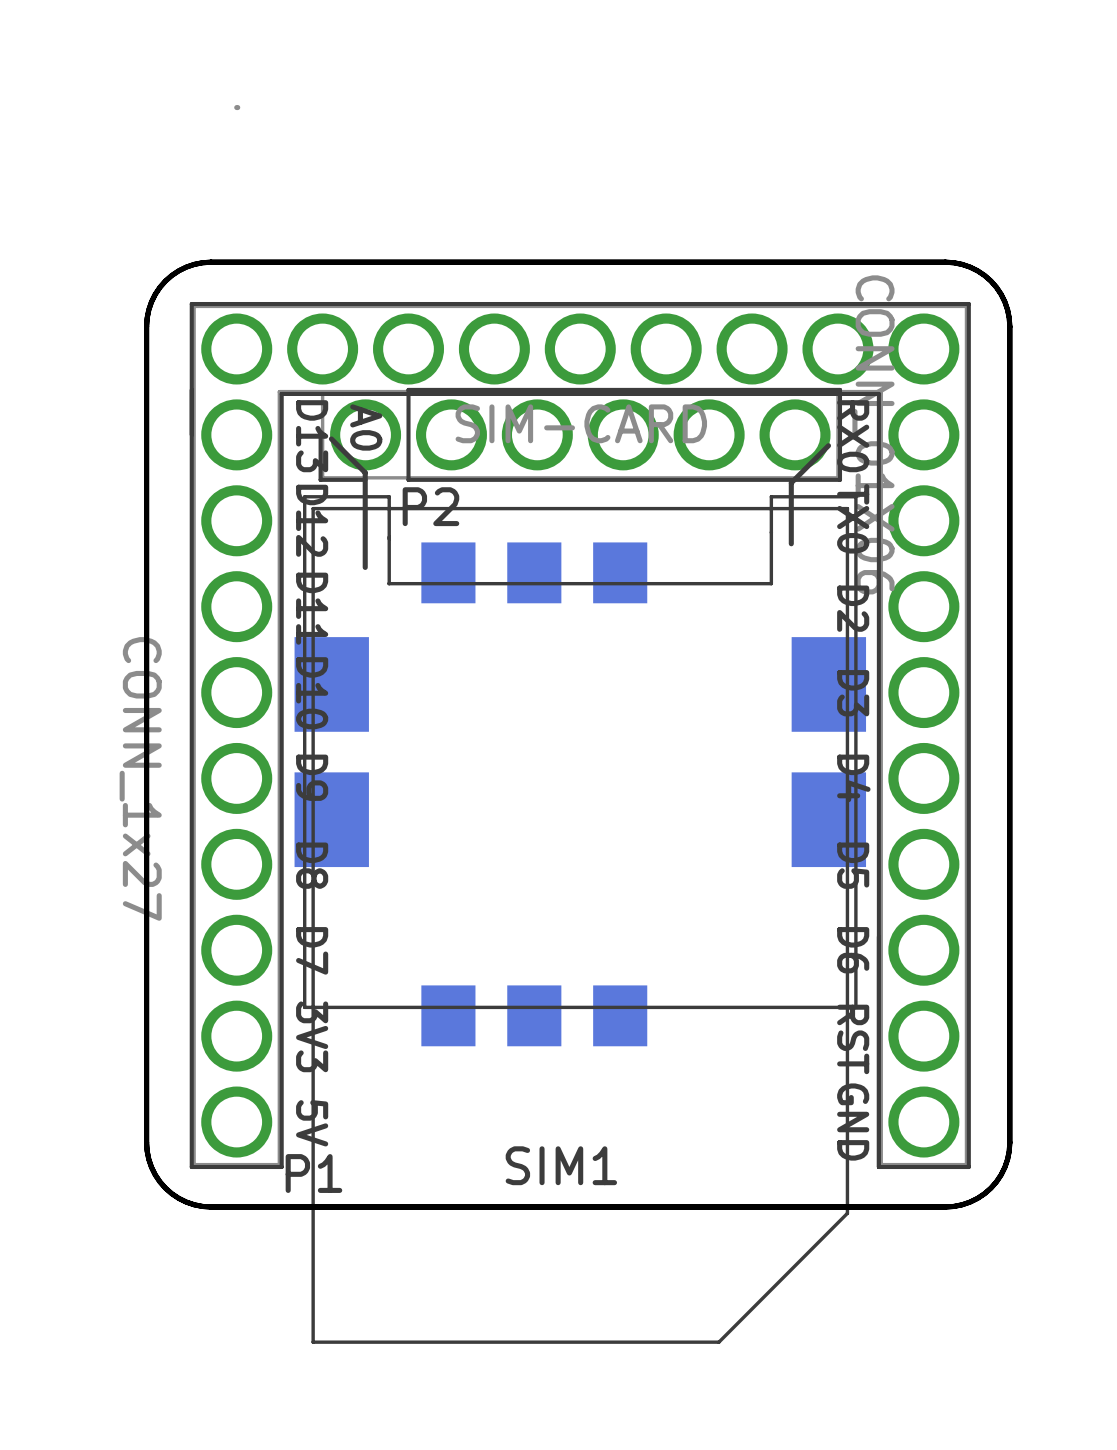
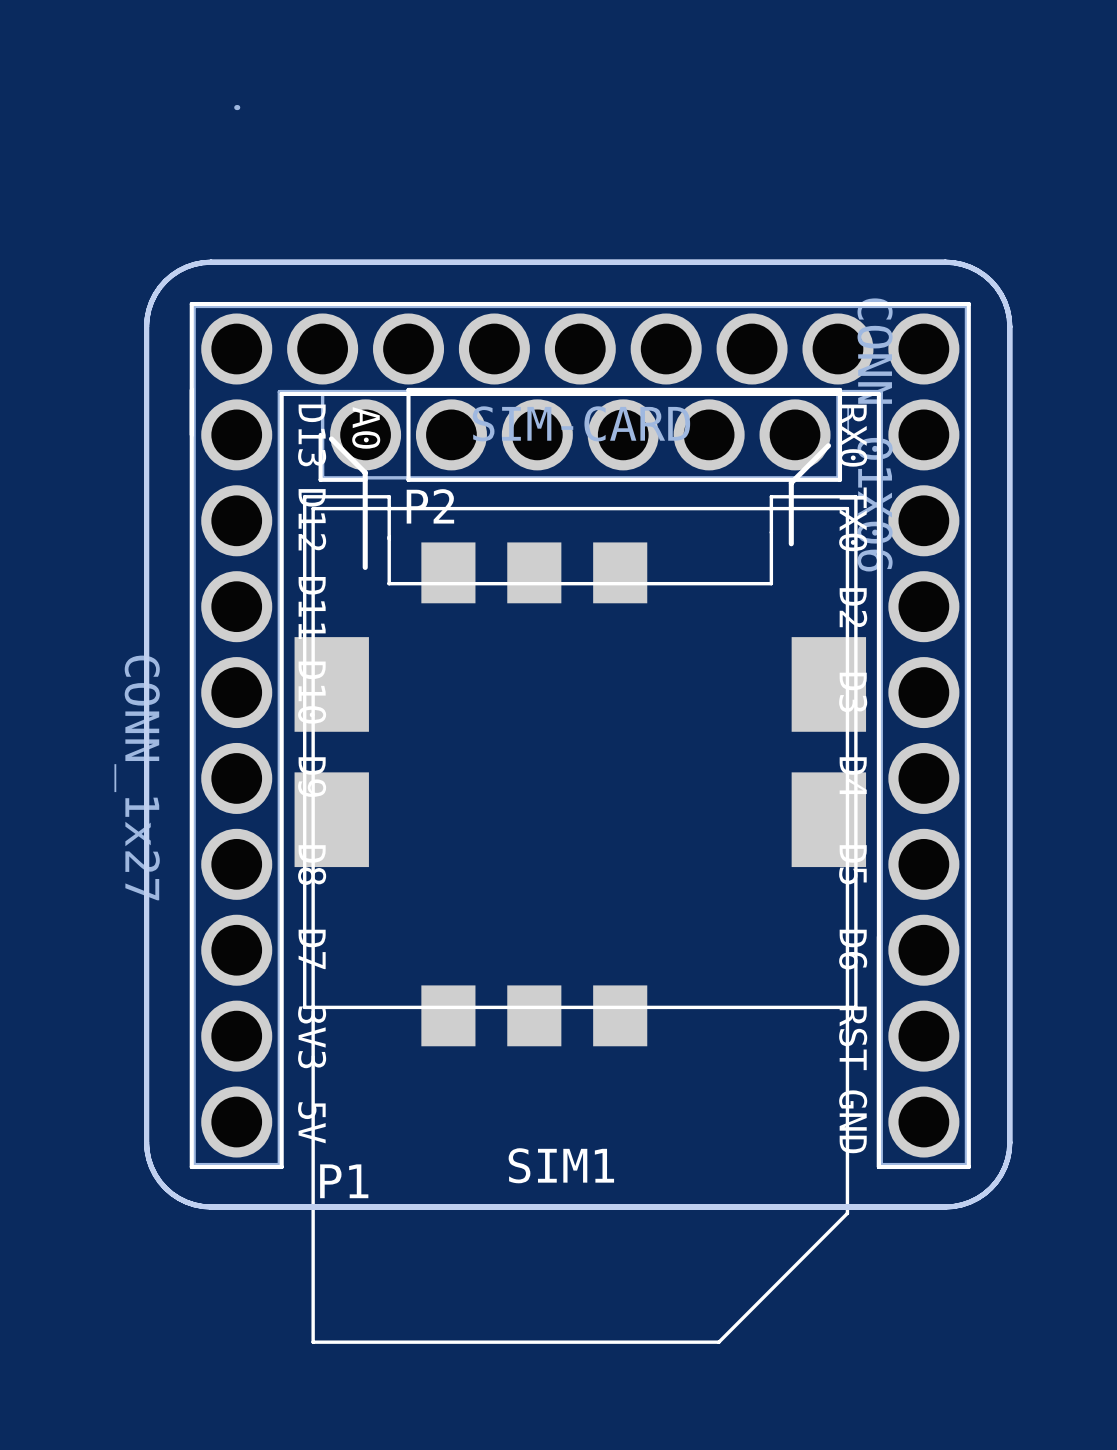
P1 name position: P1 (313, 1173) -> P1 (344, 1181)

